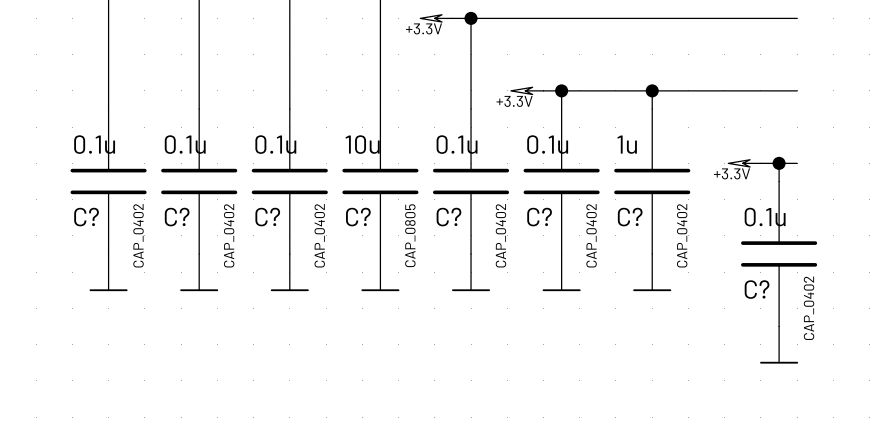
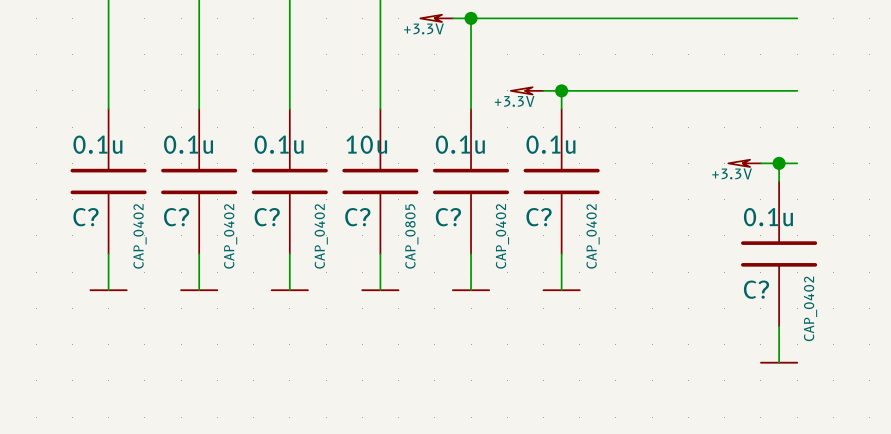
wire: (652, 90) (652, 109) -> none
junction: (652, 90) -> none
C?: 1u (652, 181) -> none
wire: (652, 253) (652, 290) -> none
power symbol: (652, 290) -> none

